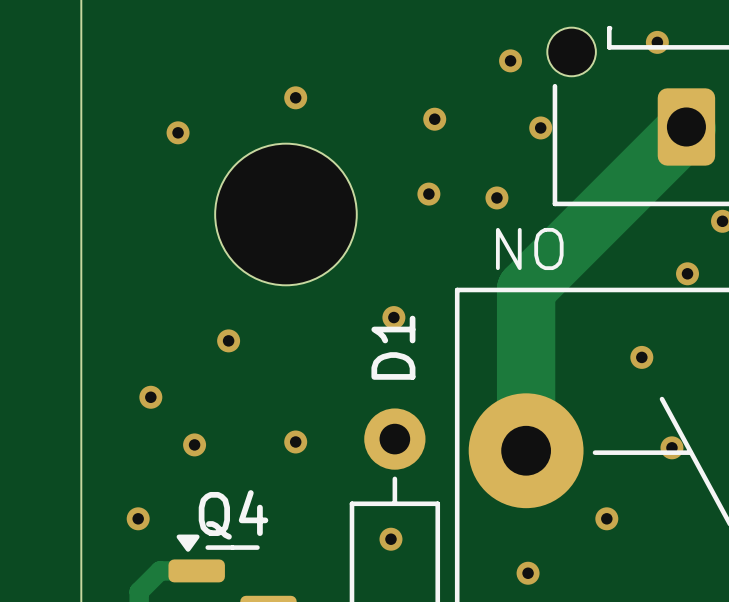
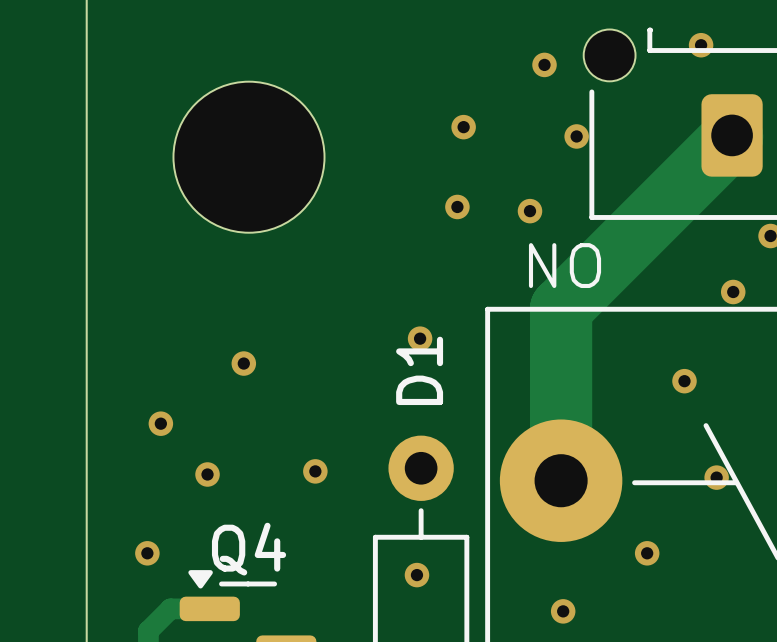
via: (295, 97) -> none
via: (178, 132) -> none
part position: (285, 214) -> (248, 157)

